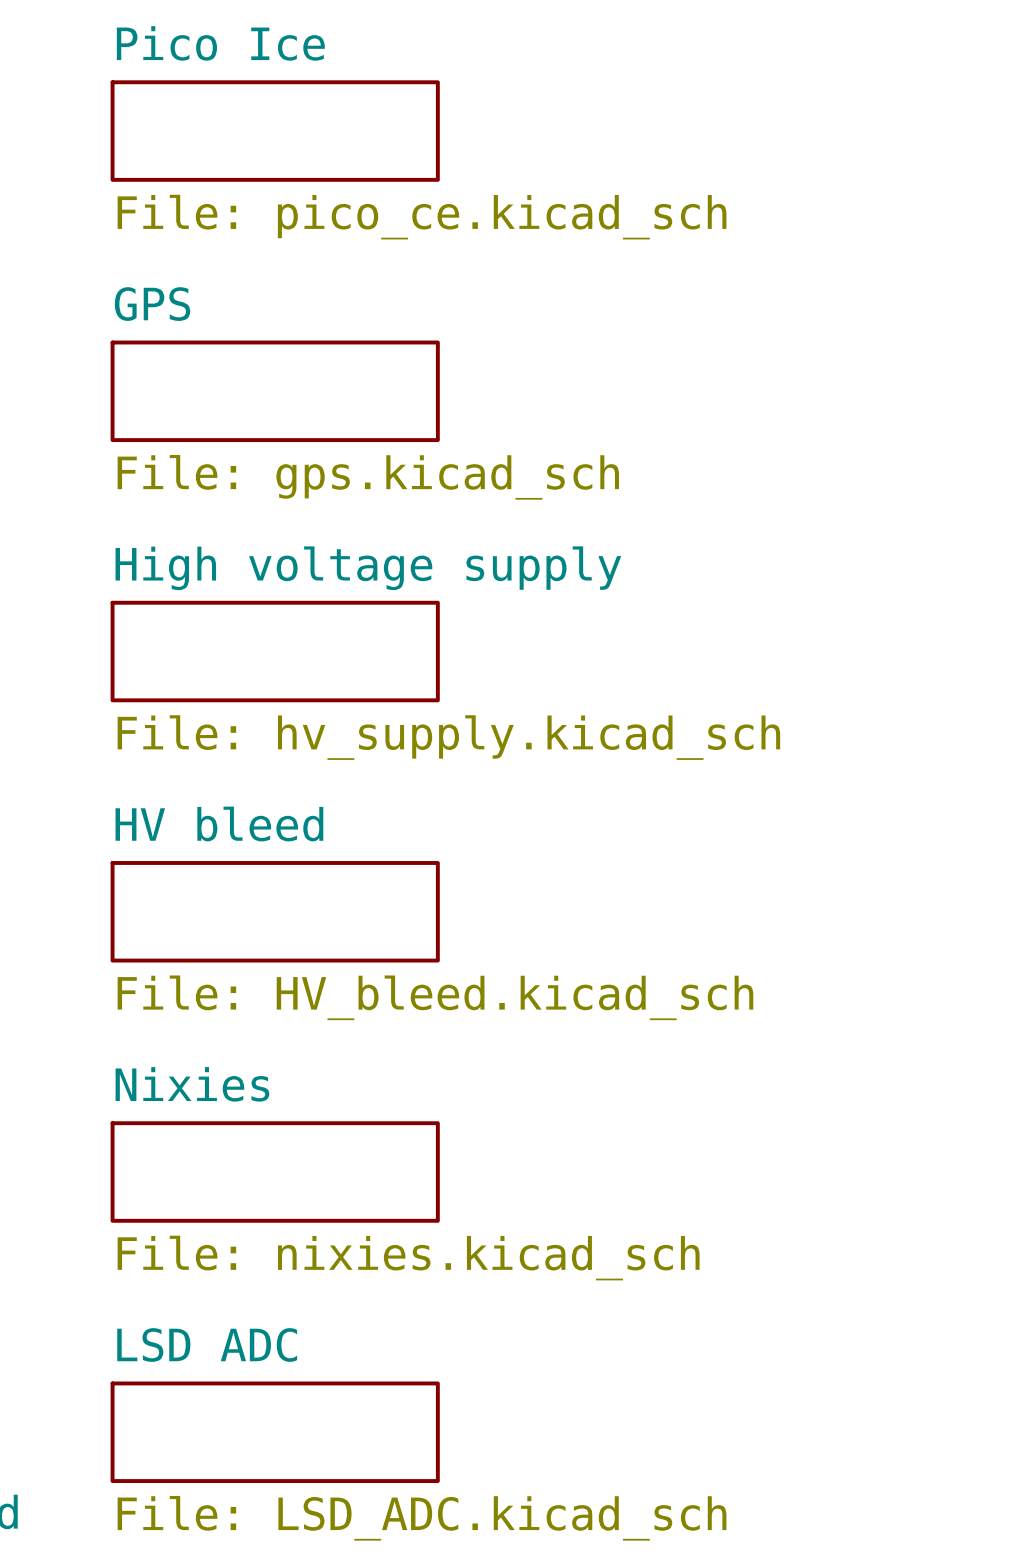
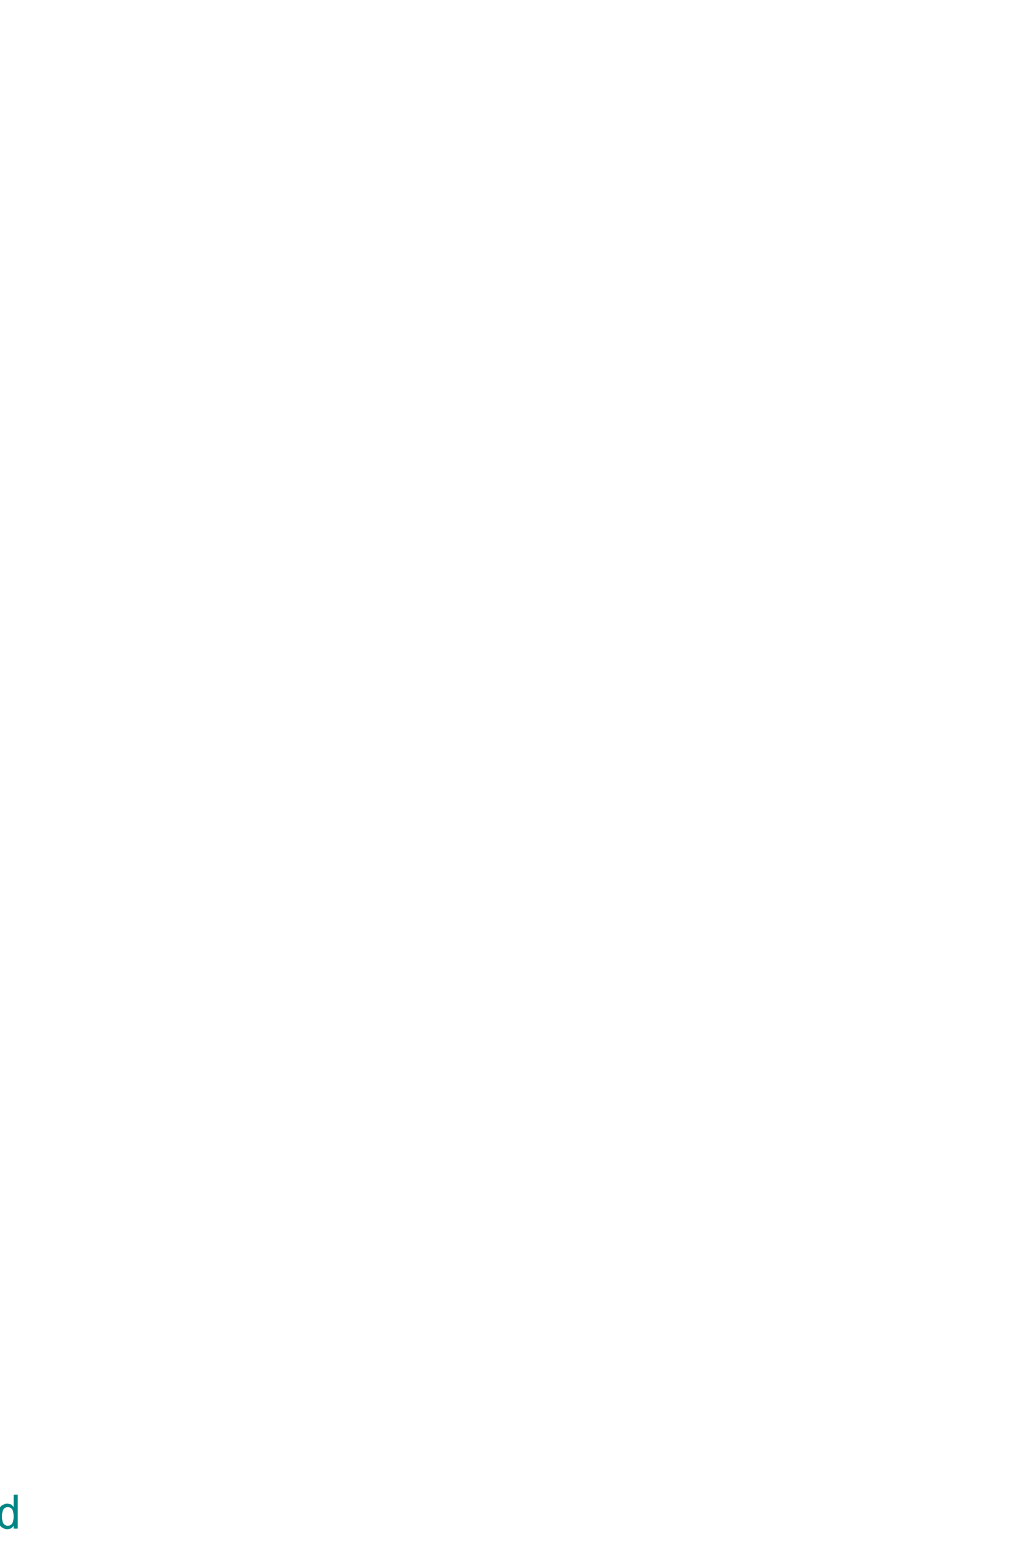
sheet Pico Ice: File: pico_ce.kicad_sch (275, 131) -> none
sheet GPS: File: gps.kicad_sch (275, 391) -> none
sheet High voltage supply: File: hv_supply.kicad_sch (275, 651) -> none
sheet HV bleed: File: HV_bleed.kicad_sch (275, 911) -> none
sheet Nixies: File: nixies.kicad_sch (275, 1172) -> none
sheet LSD ADC: File: LSD_ADC.kicad_sch (275, 1432) -> none

